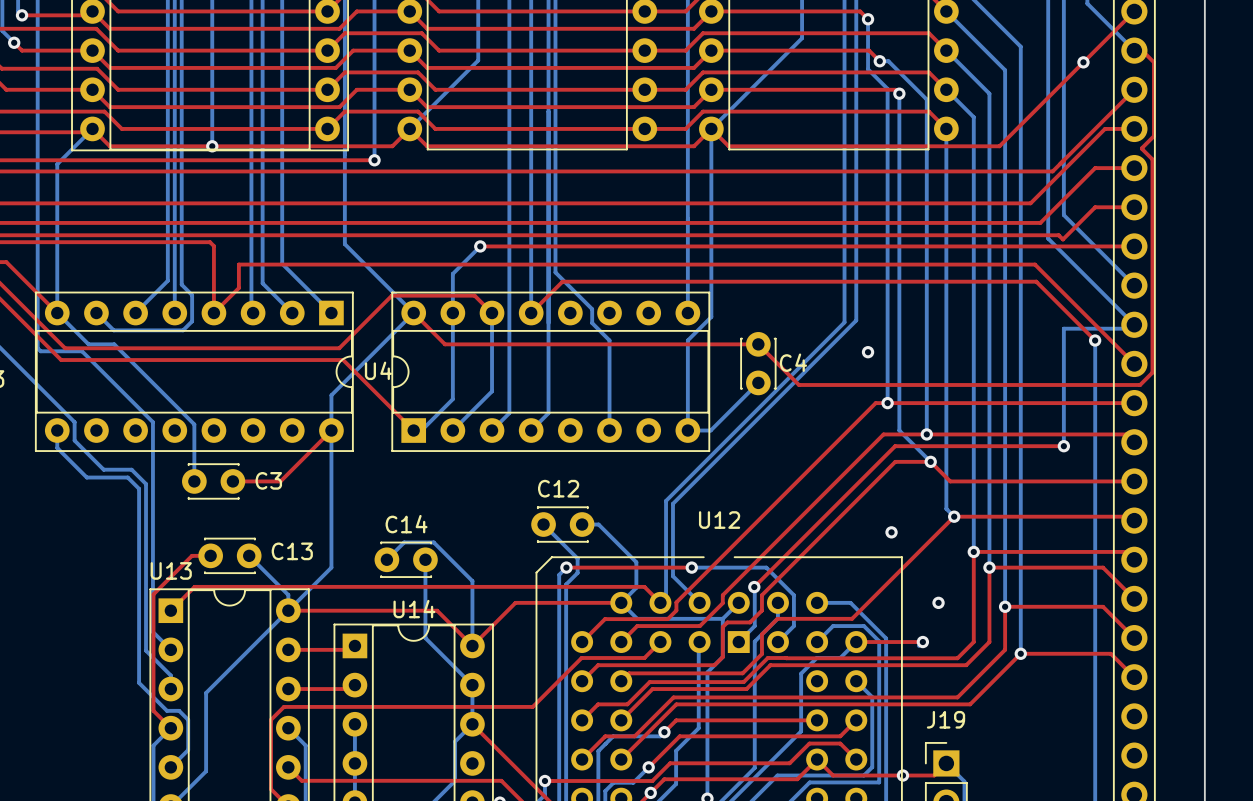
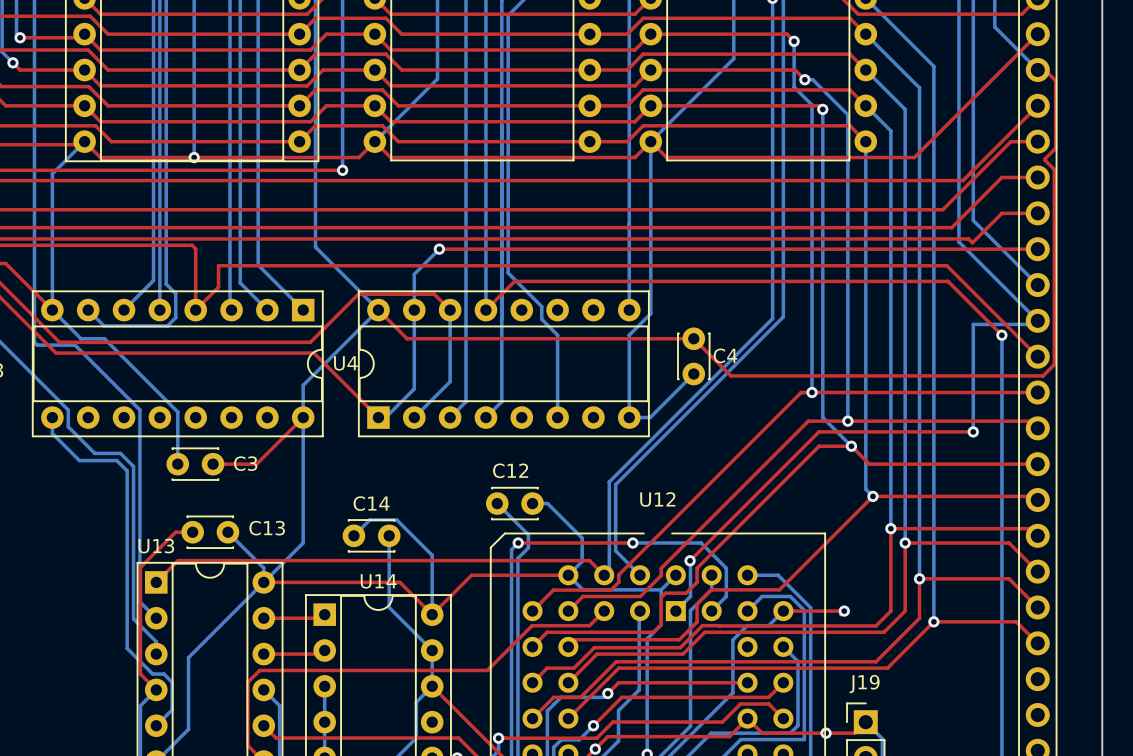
via: (1083, 62) -> none
via: (868, 352) -> none
via: (891, 532) -> none
via: (938, 602) -> none

